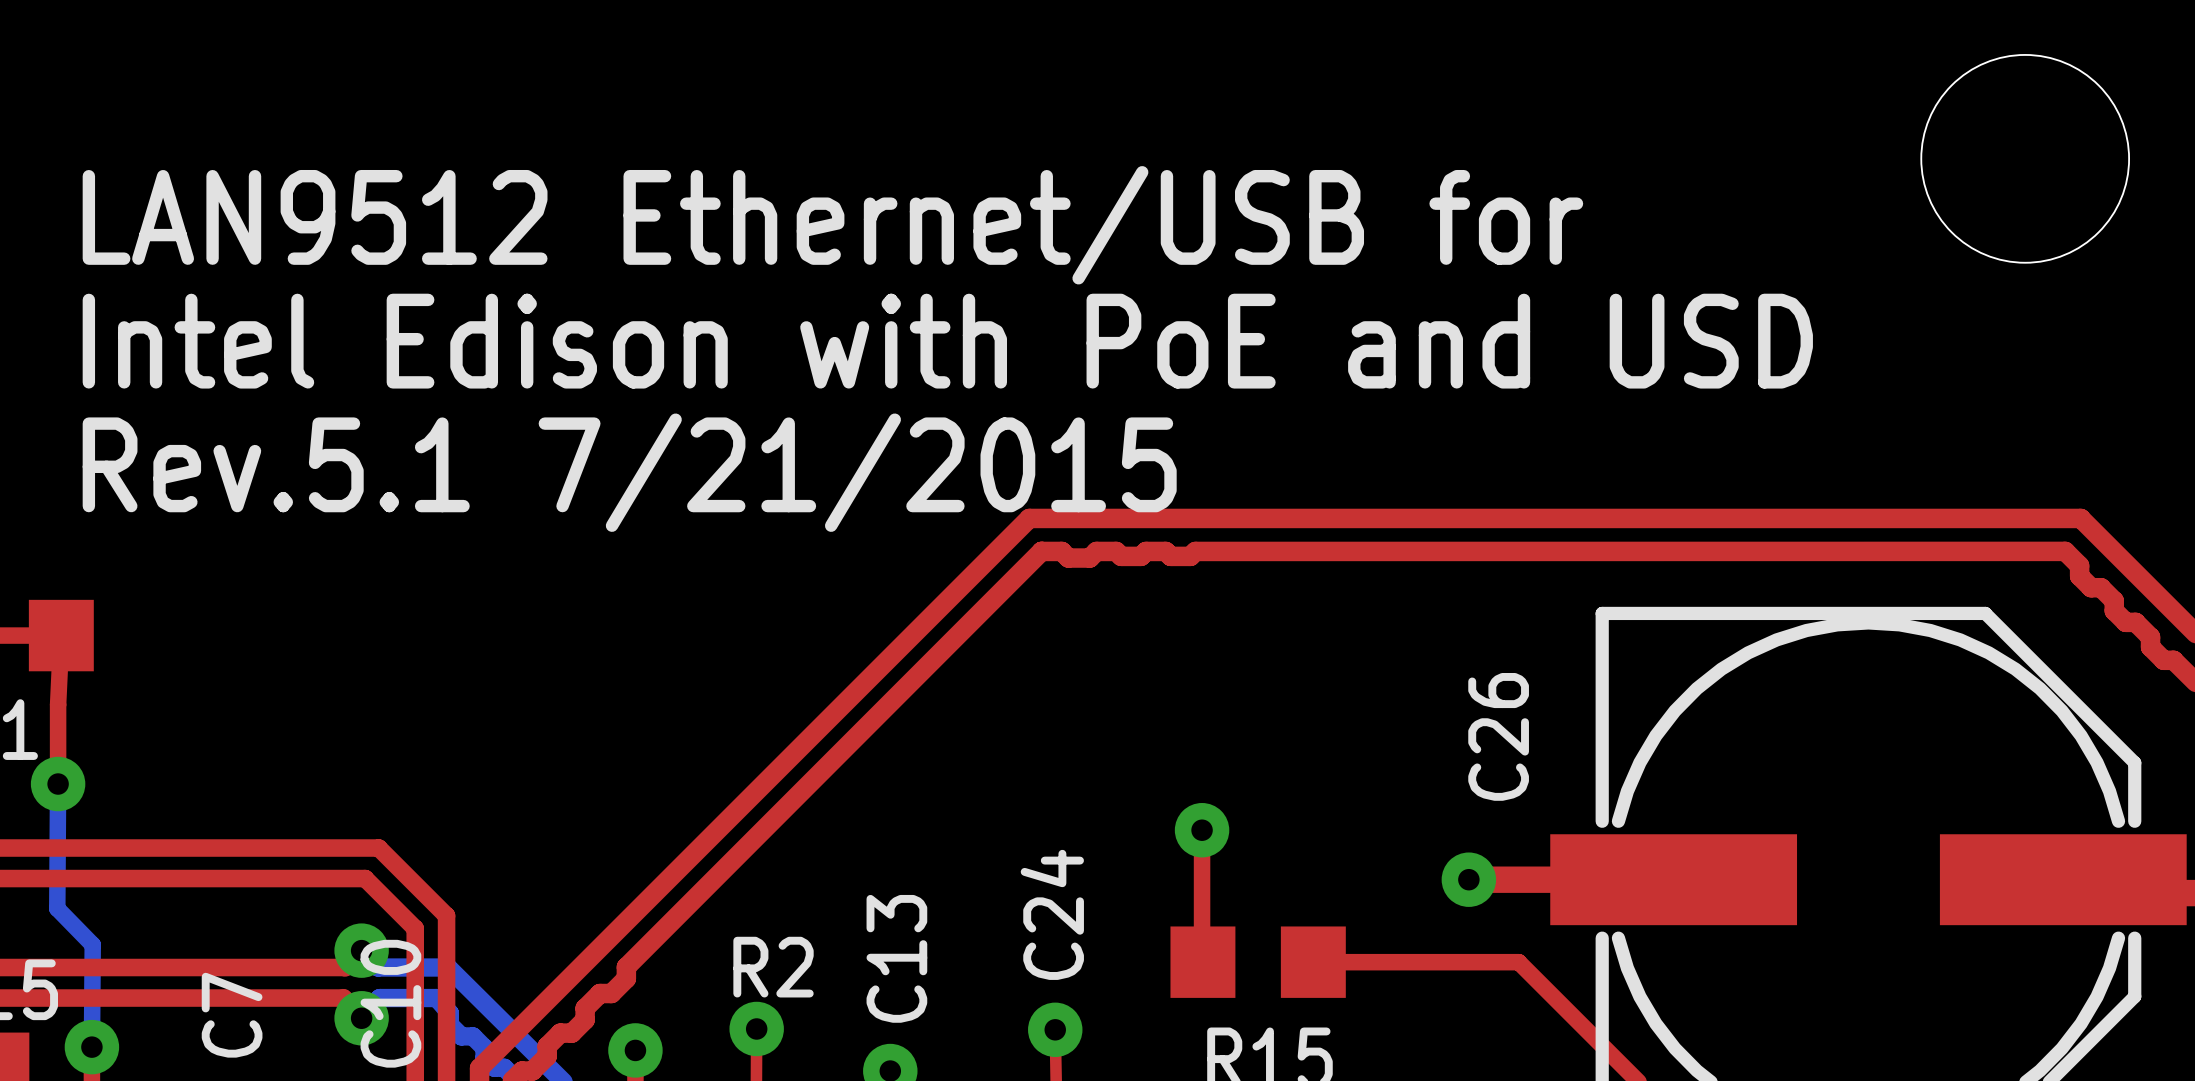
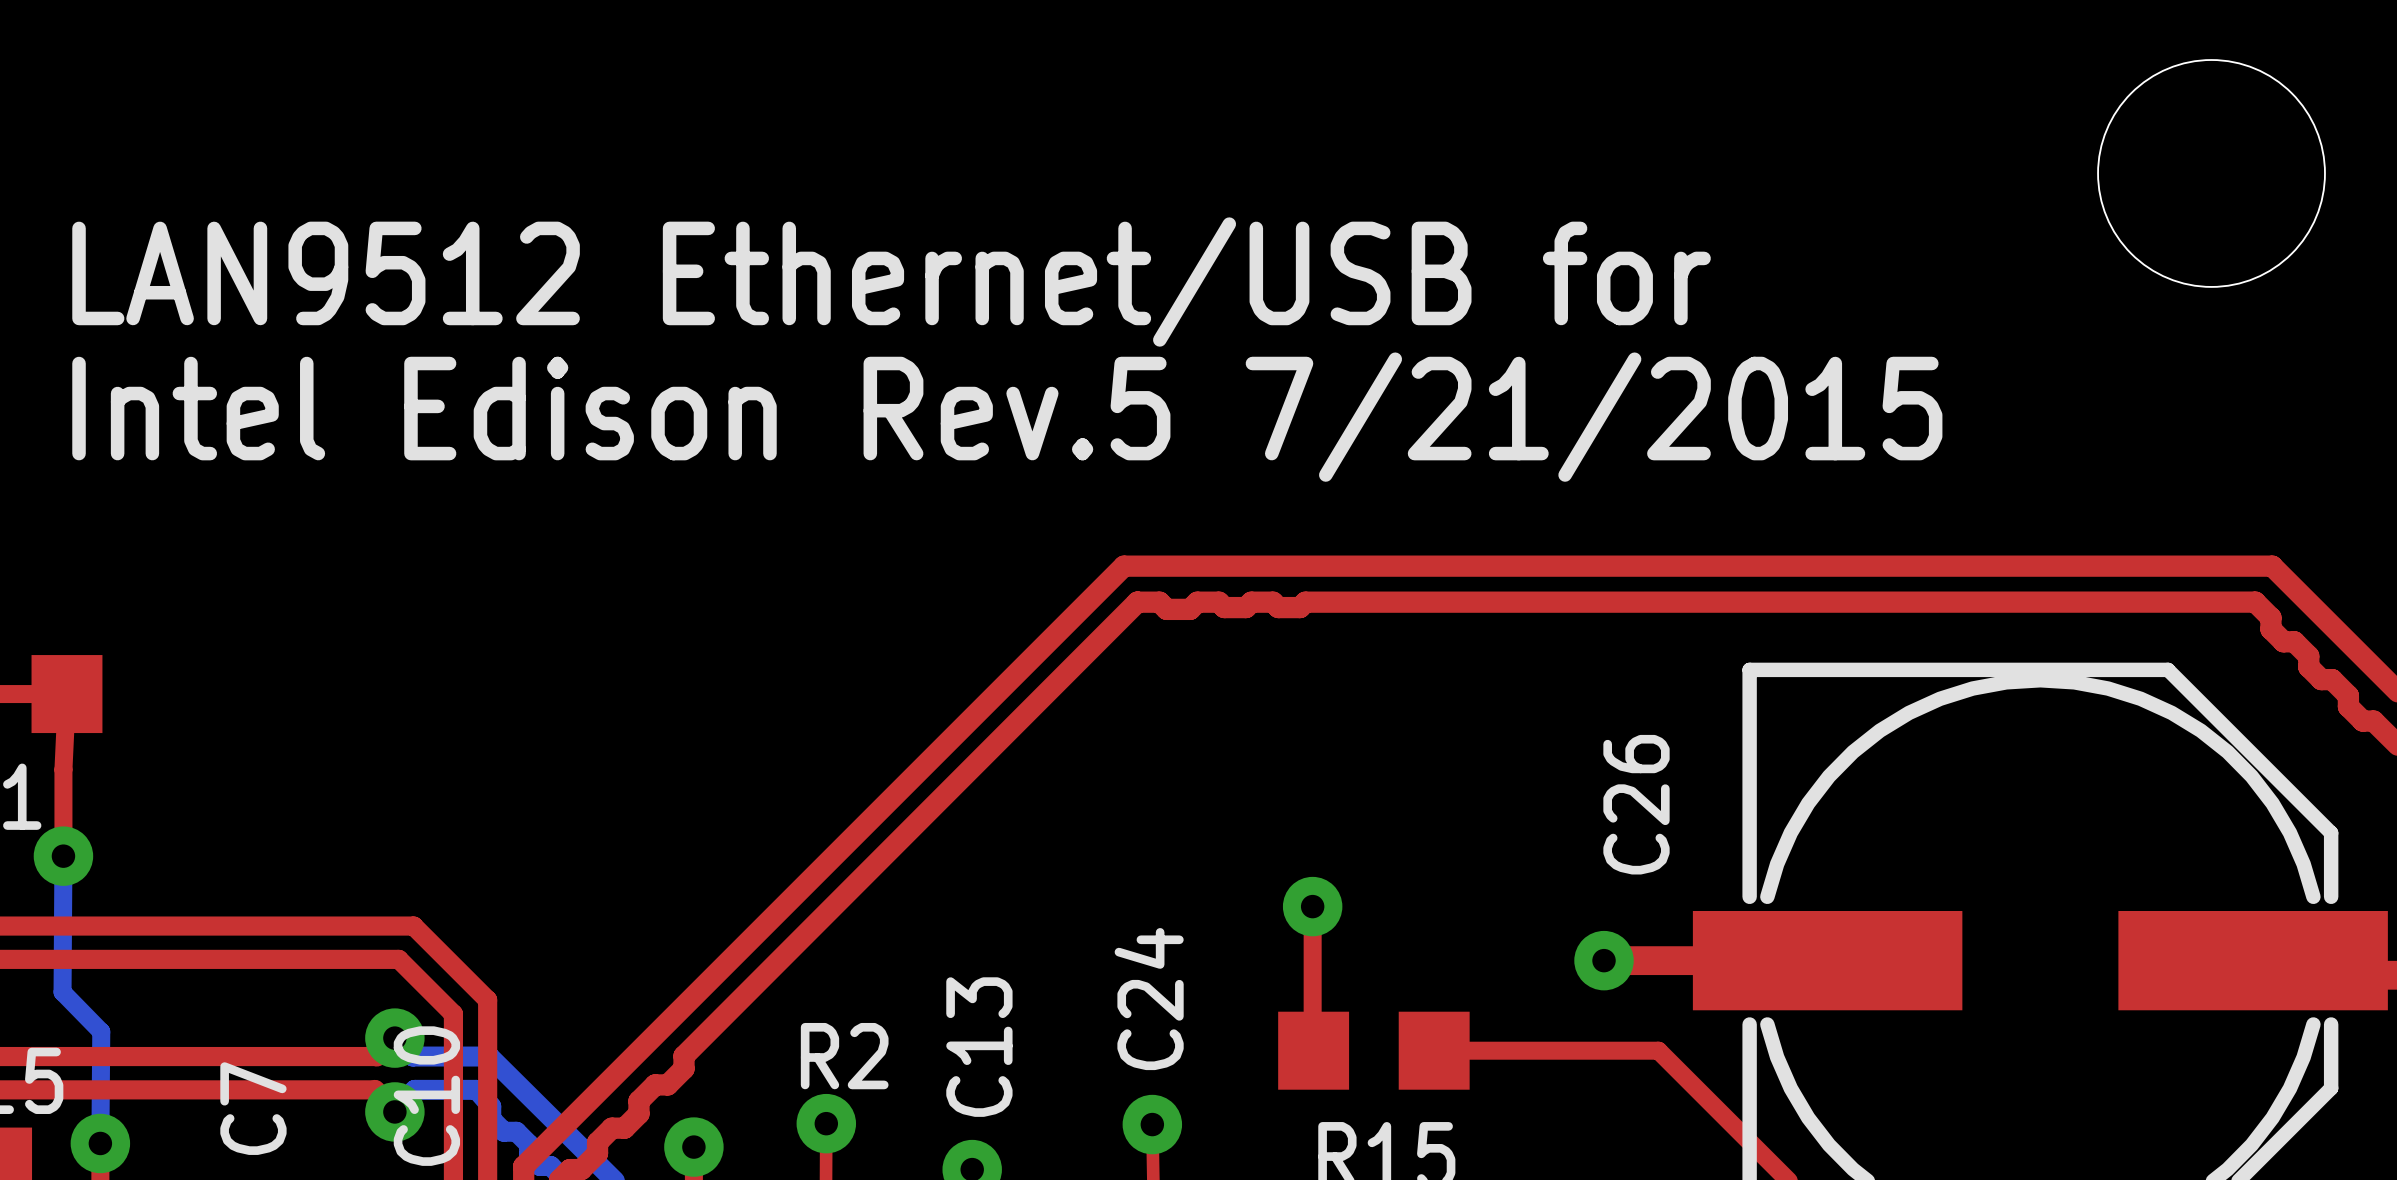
text position: LAN9512 Ethernet/USB for (832, 225) -> LAN9512 Ethernet/USB for (891, 282)
text: Intel Edison with PoE and USD (947, 341) -> Intel Edison Rev.5 7/21/2015 (1007, 417)
text: Rev.5.1 7/21/2015 (629, 472) -> none

